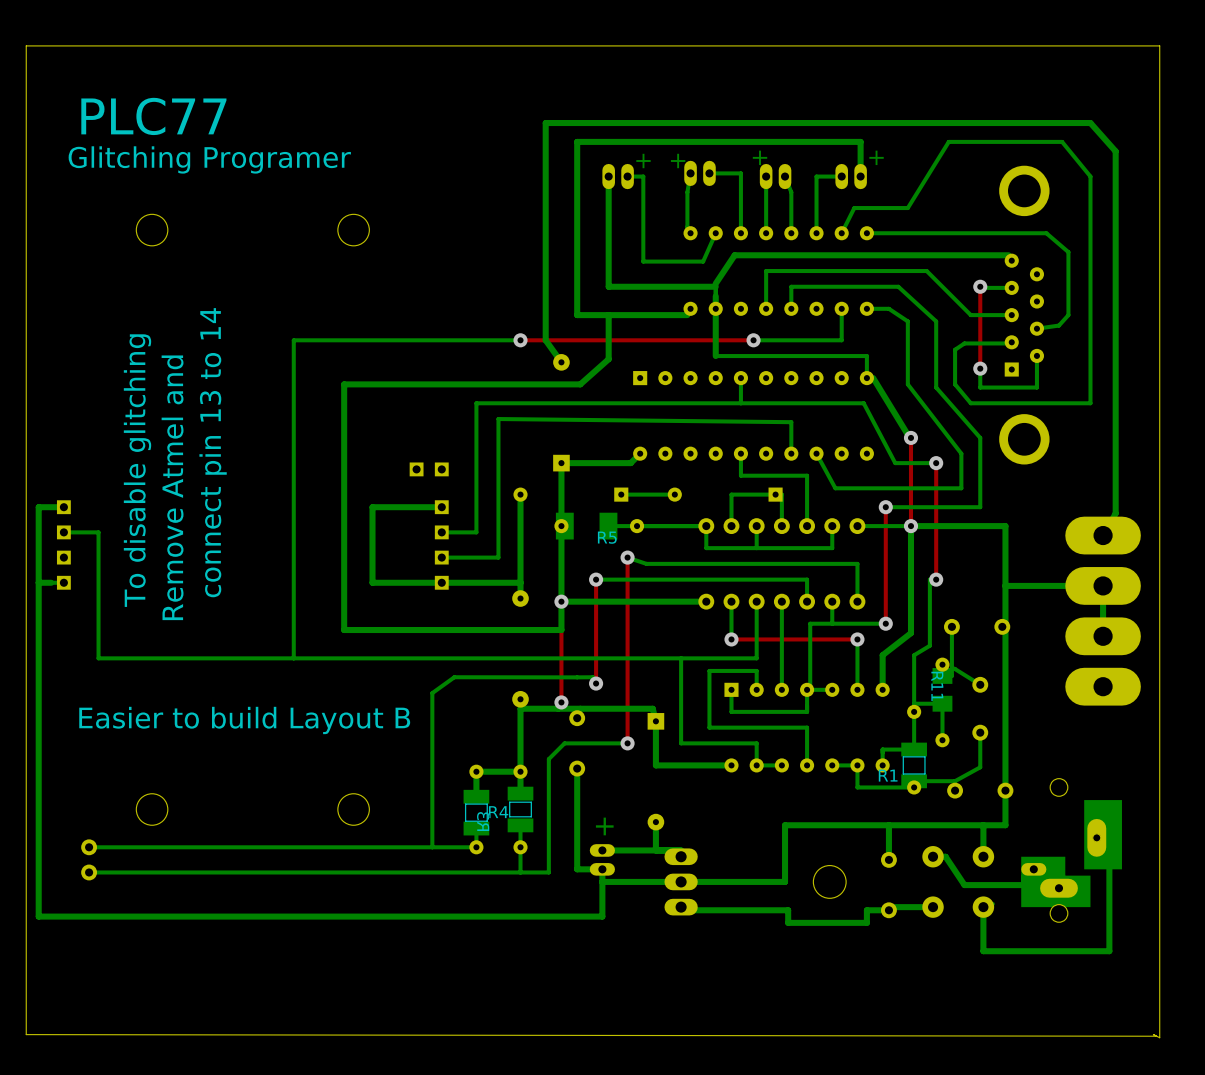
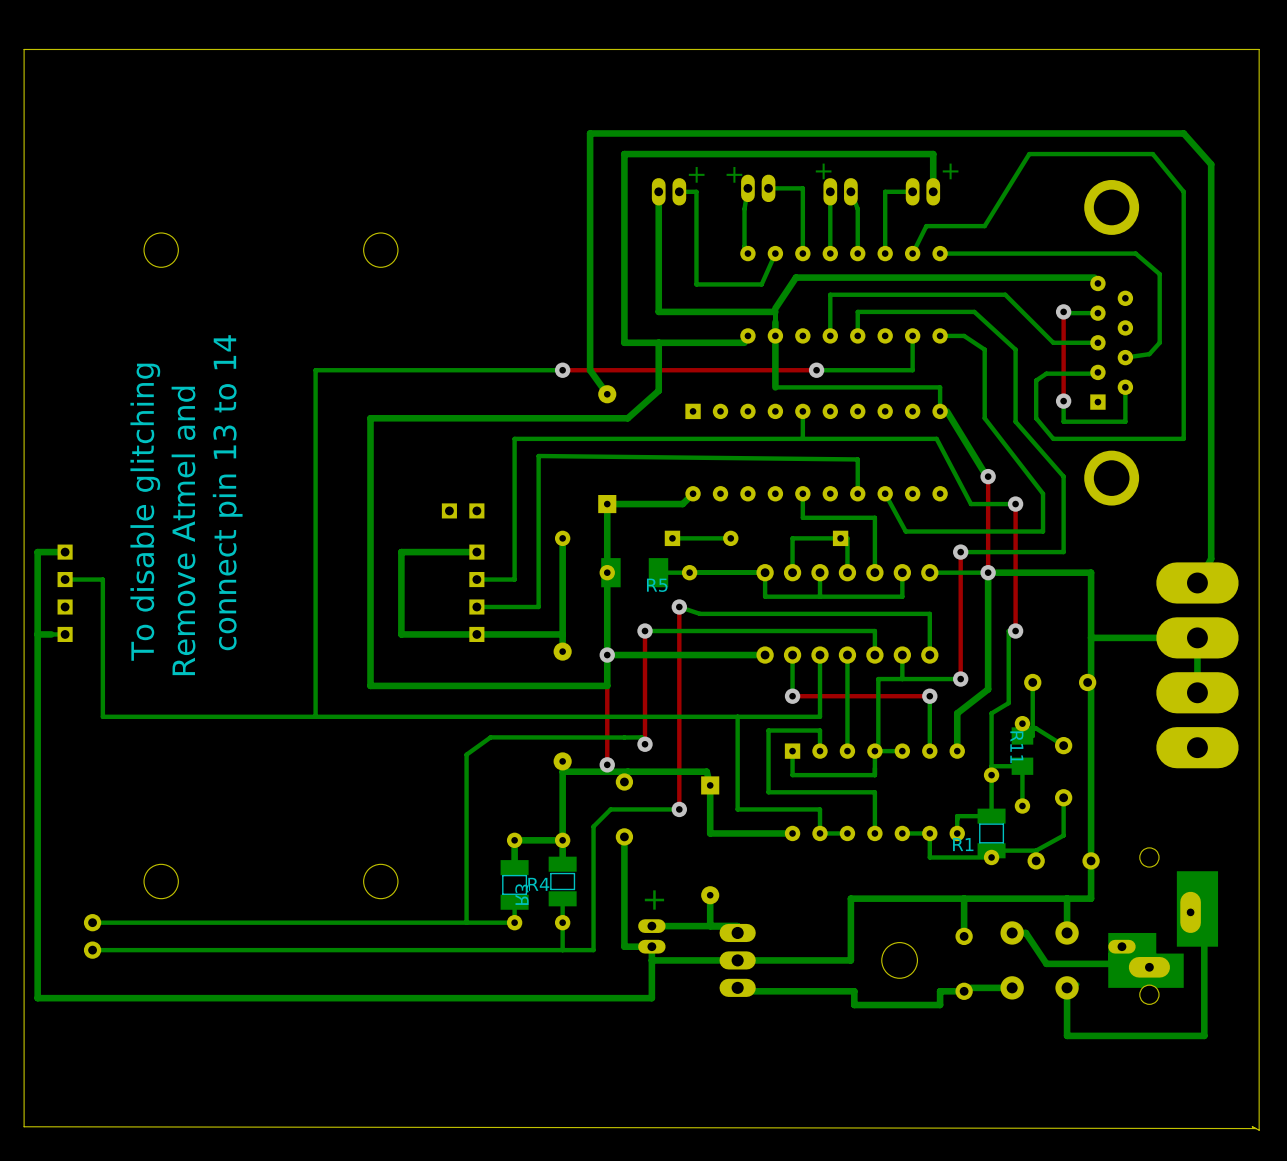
text: PLC77 (153, 116) -> none
text: Glitching Programer (209, 159) -> none
text: Easier to build Layout B (244, 720) -> none

